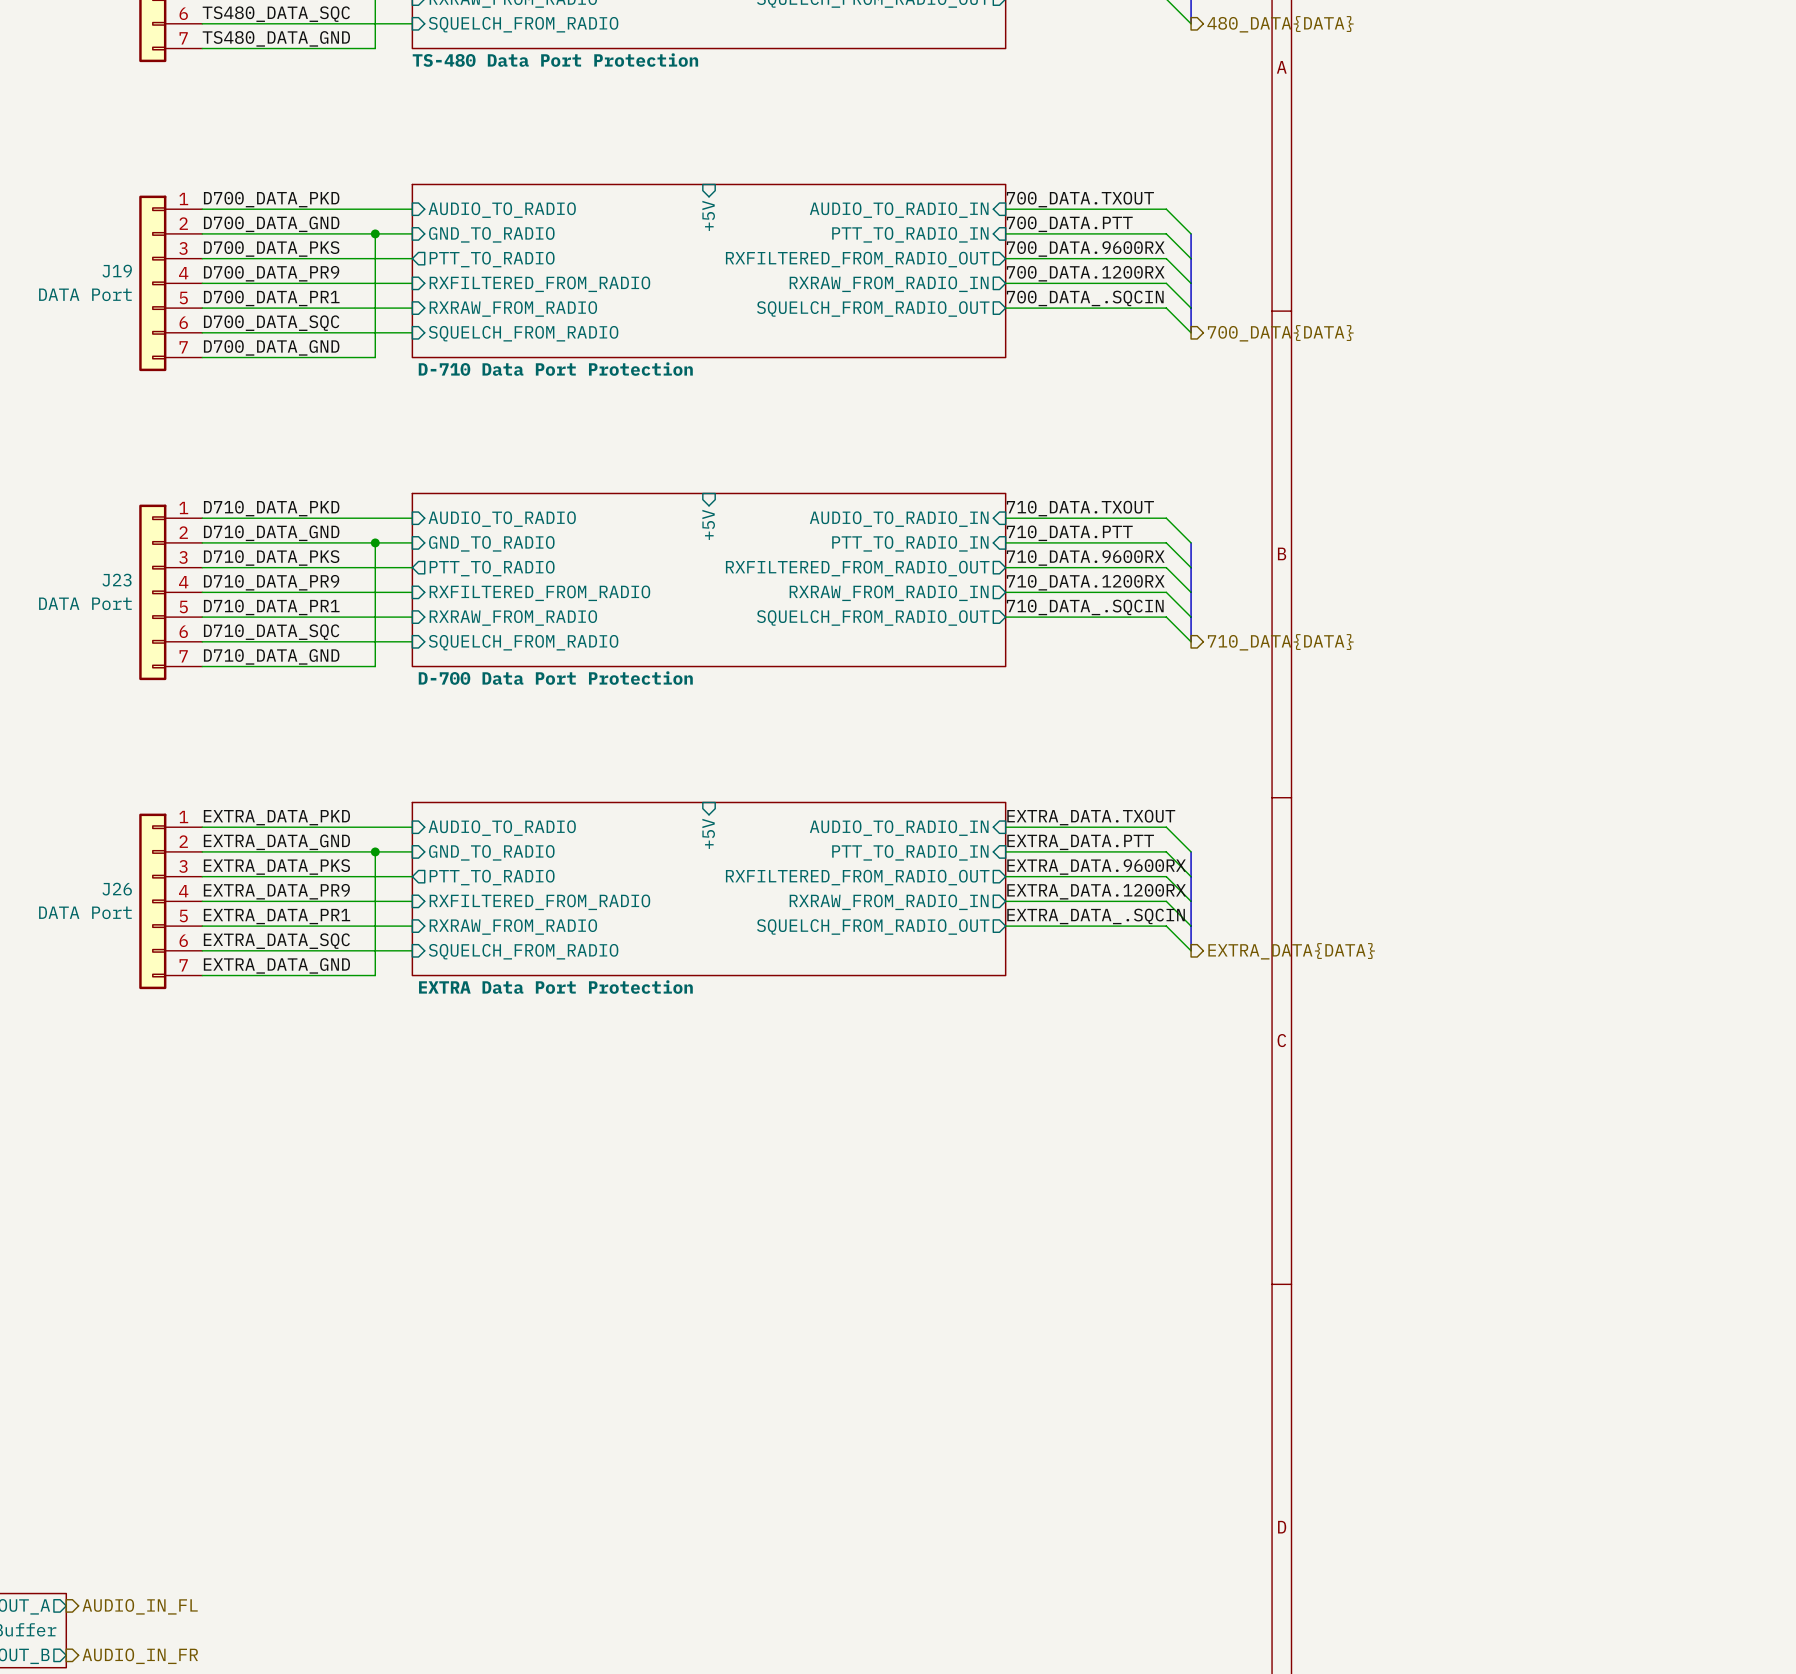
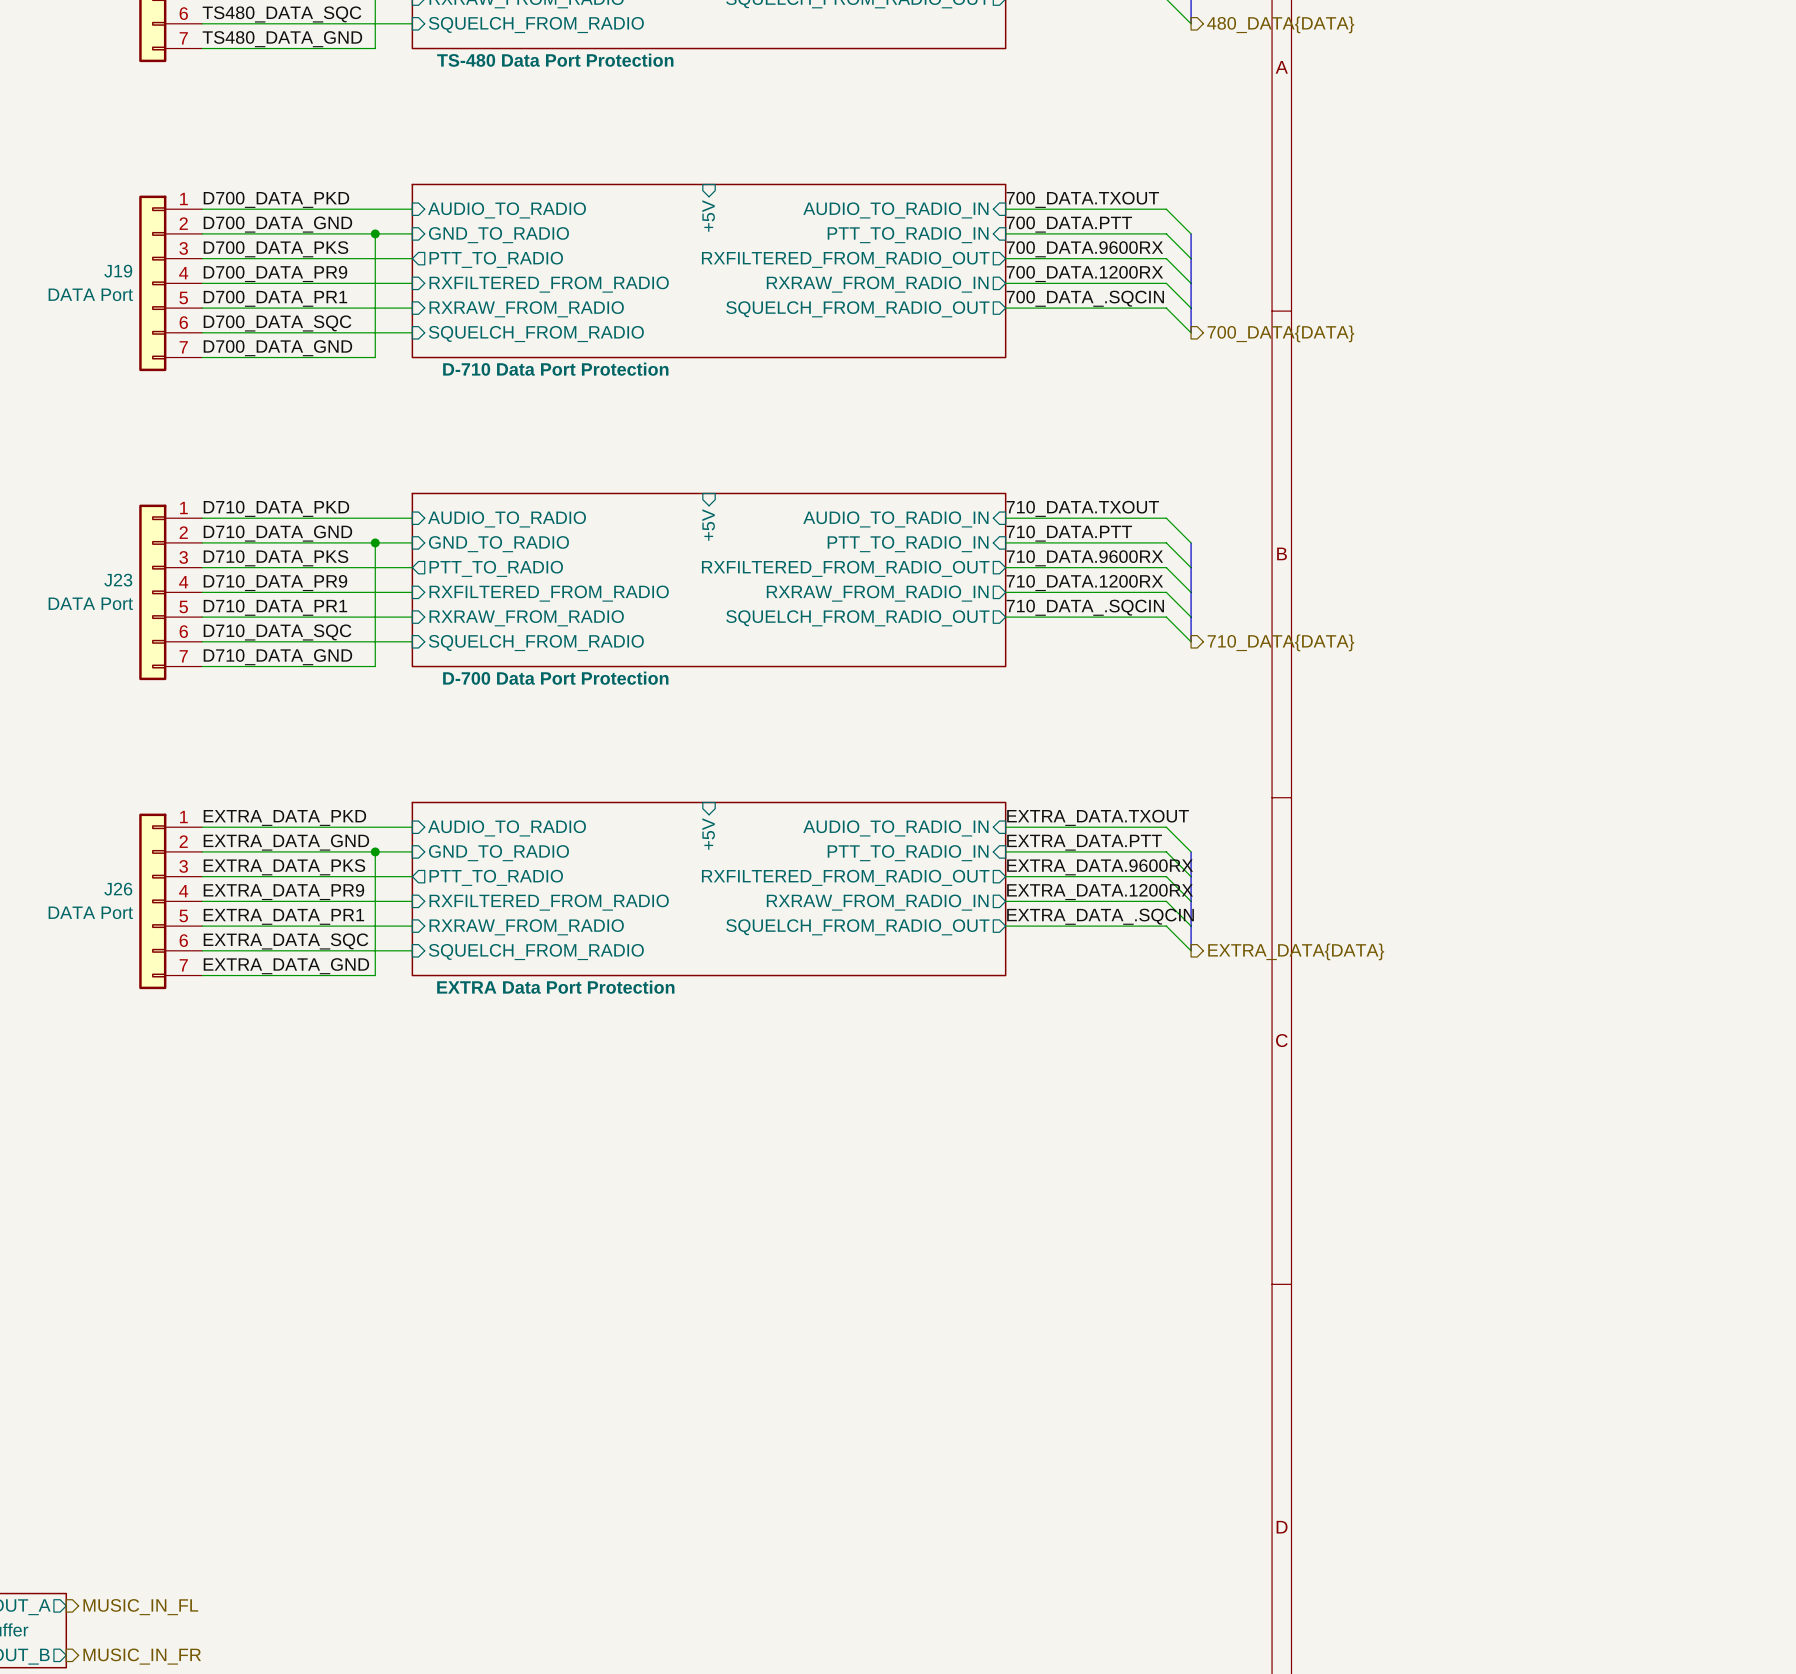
hierarchical label: AUDIO_IN_FL (140, 1606) -> MUSIC_IN_FL (140, 1607)
hierarchical label: AUDIO_IN_FR (140, 1656) -> MUSIC_IN_FR (142, 1656)

